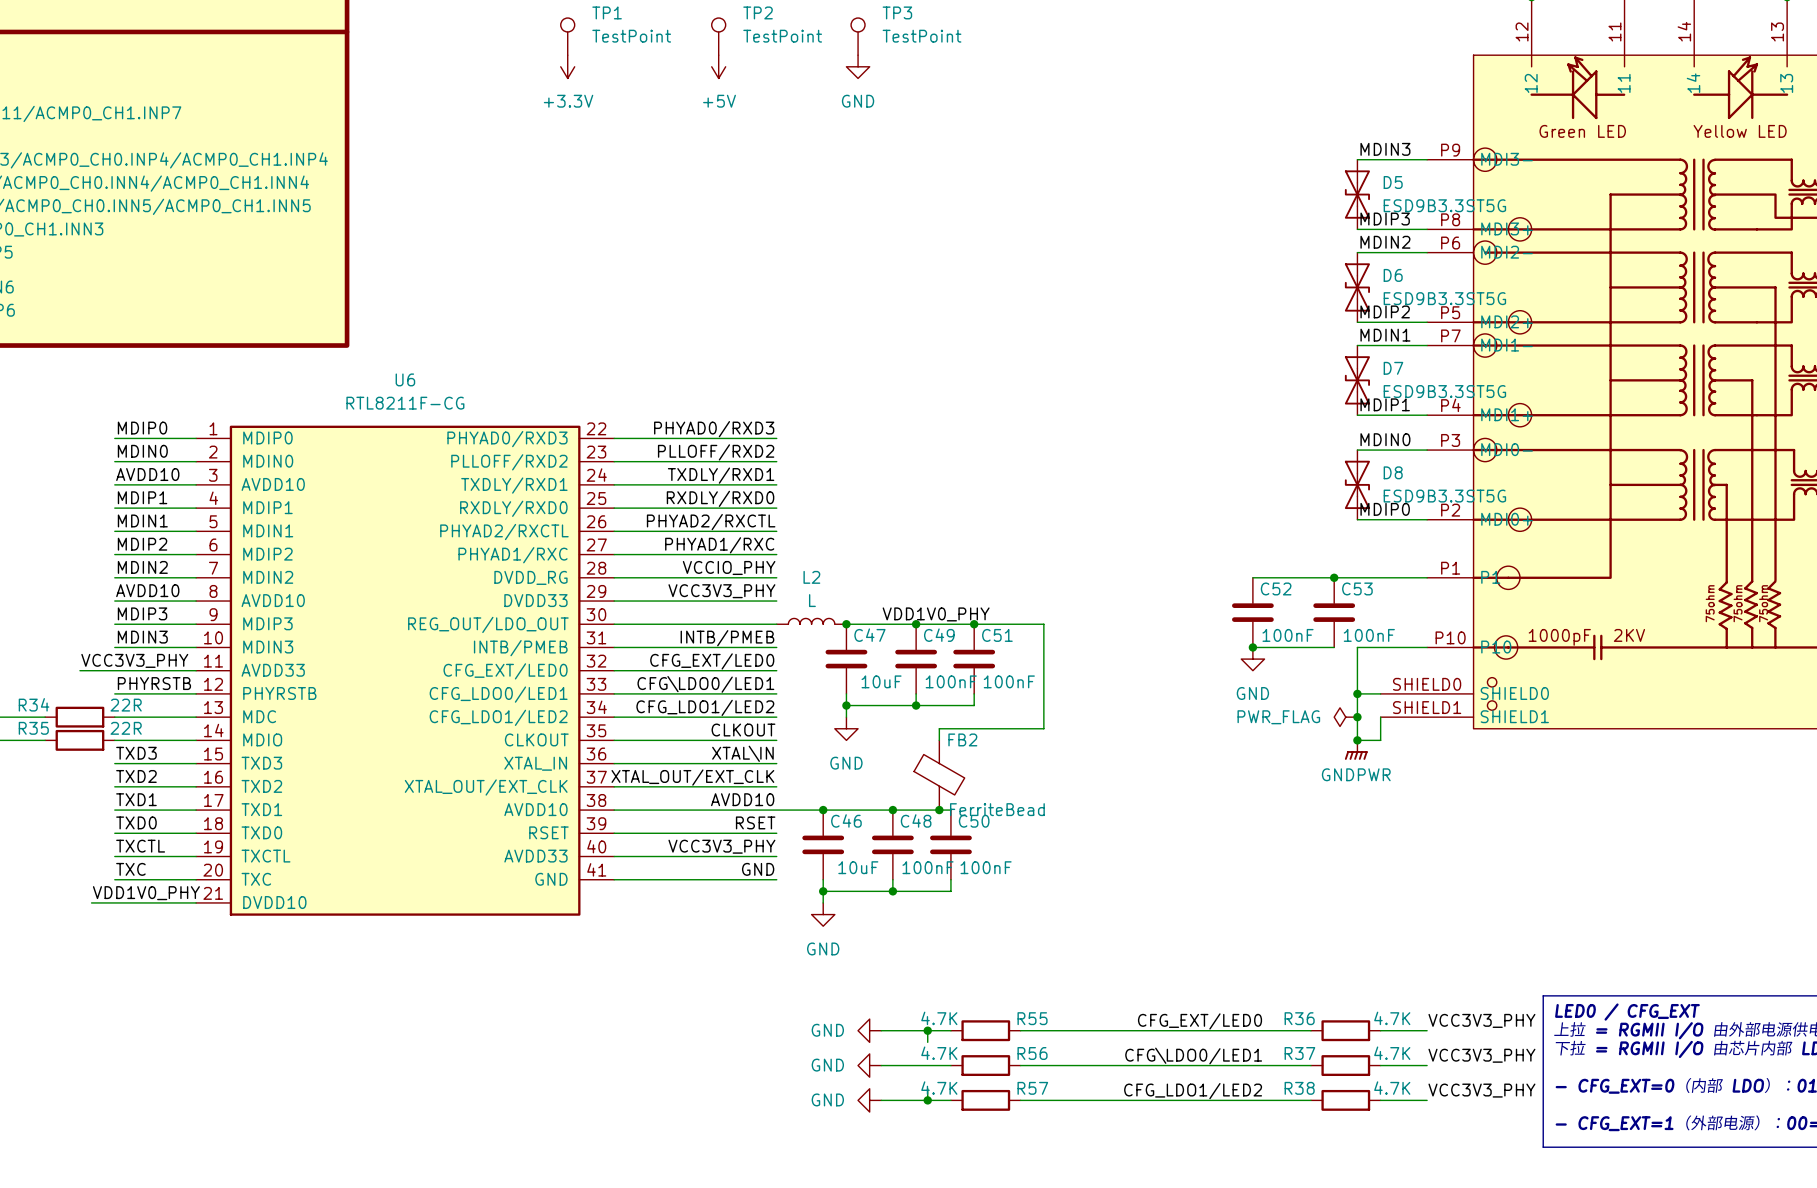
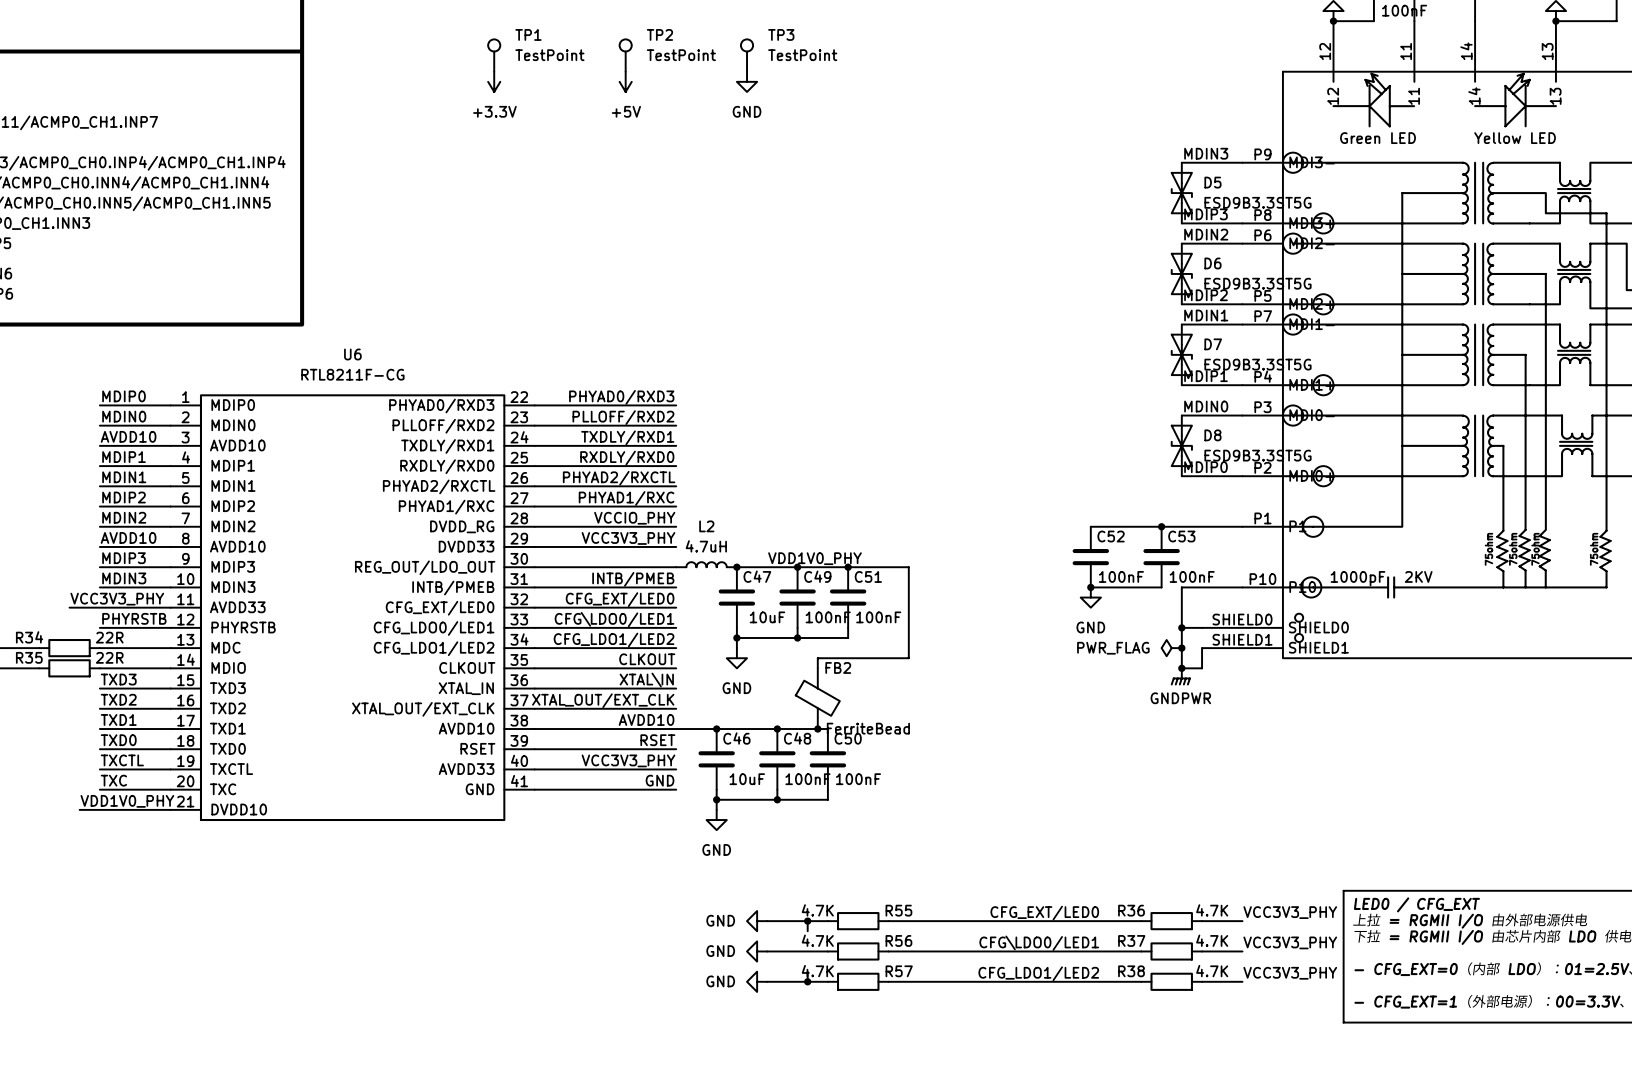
L2 value: L (812, 600) -> 4.7uH (706, 546)

